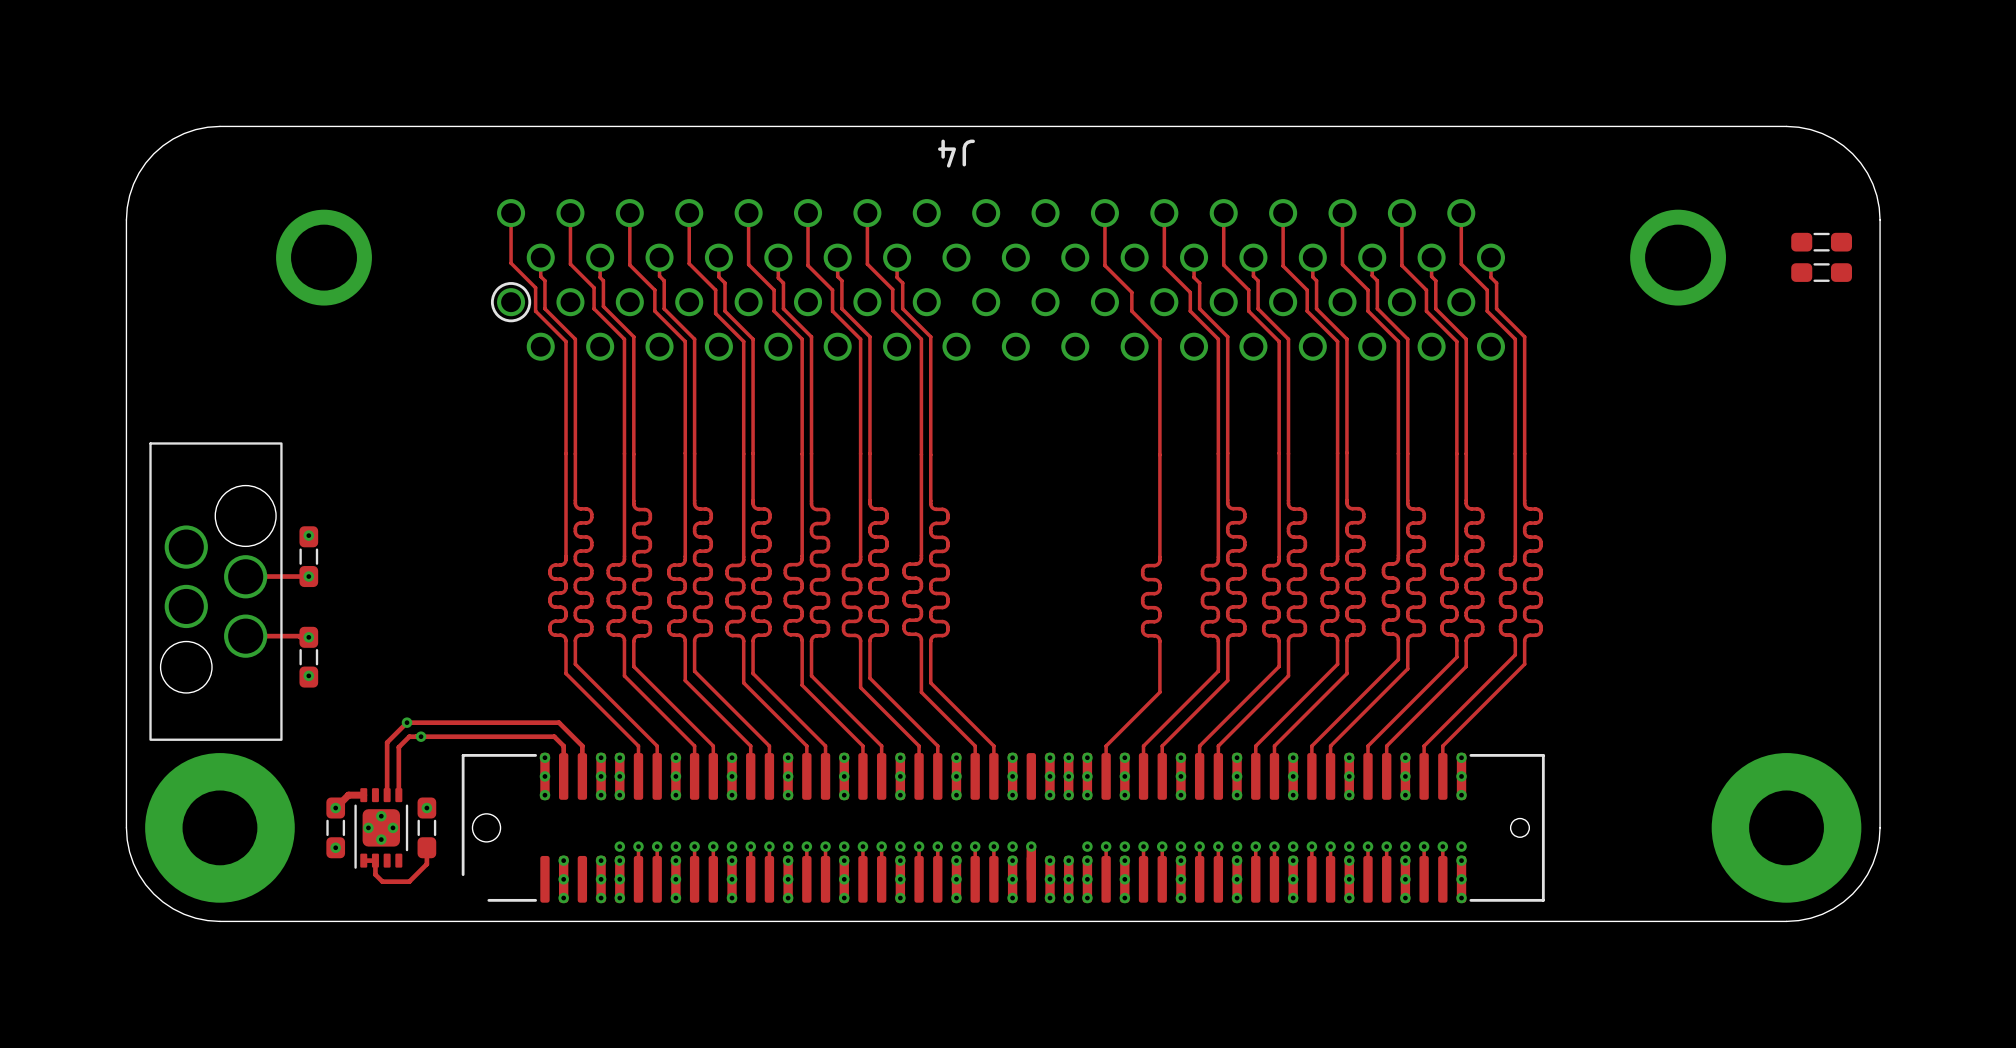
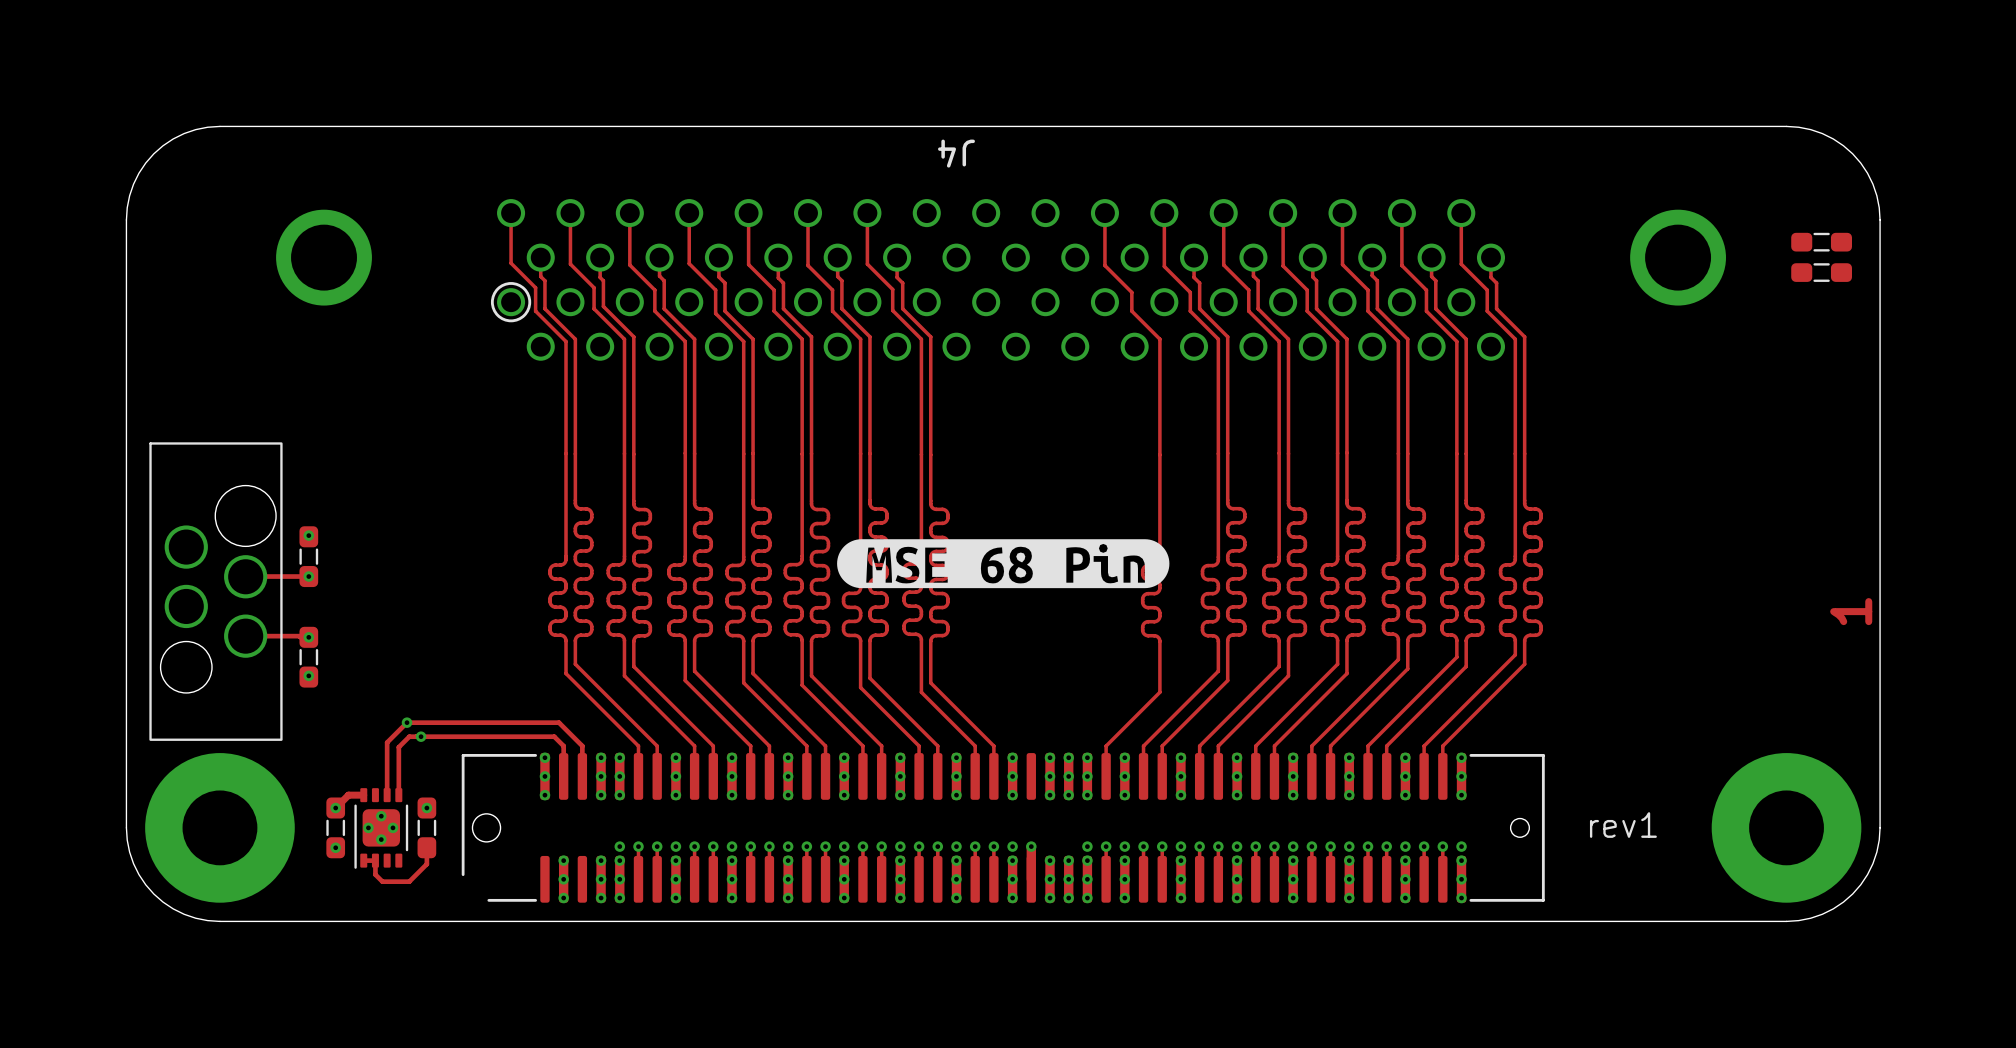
drawing: none -> [837, 539, 1170, 589]
text: none -> 1 (1851, 611)
text: none -> rev1 (1623, 825)

